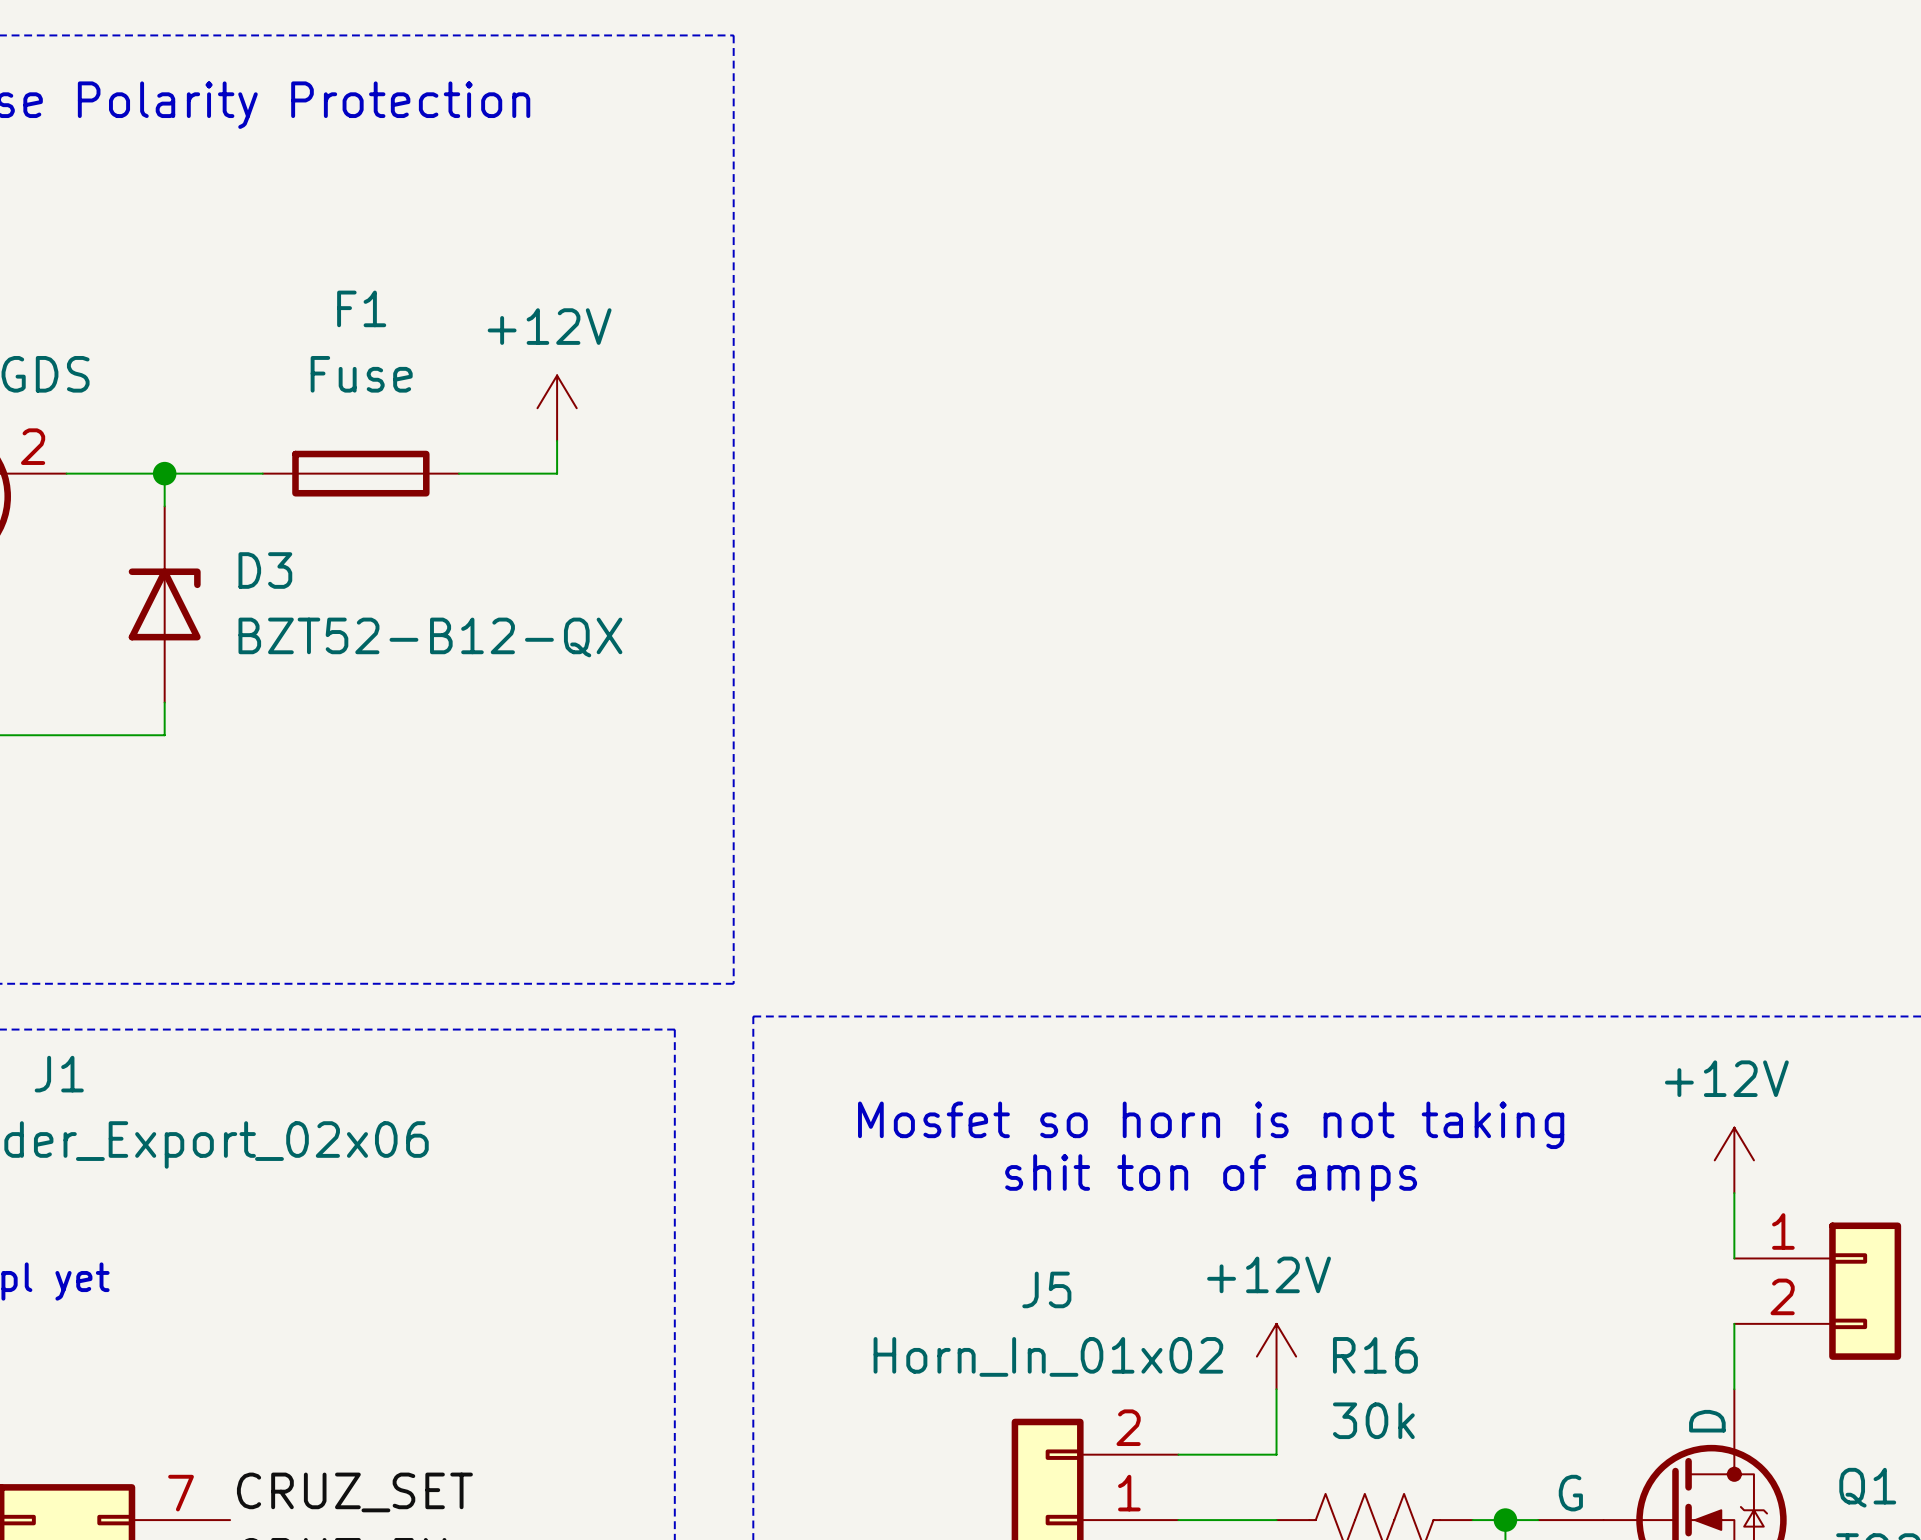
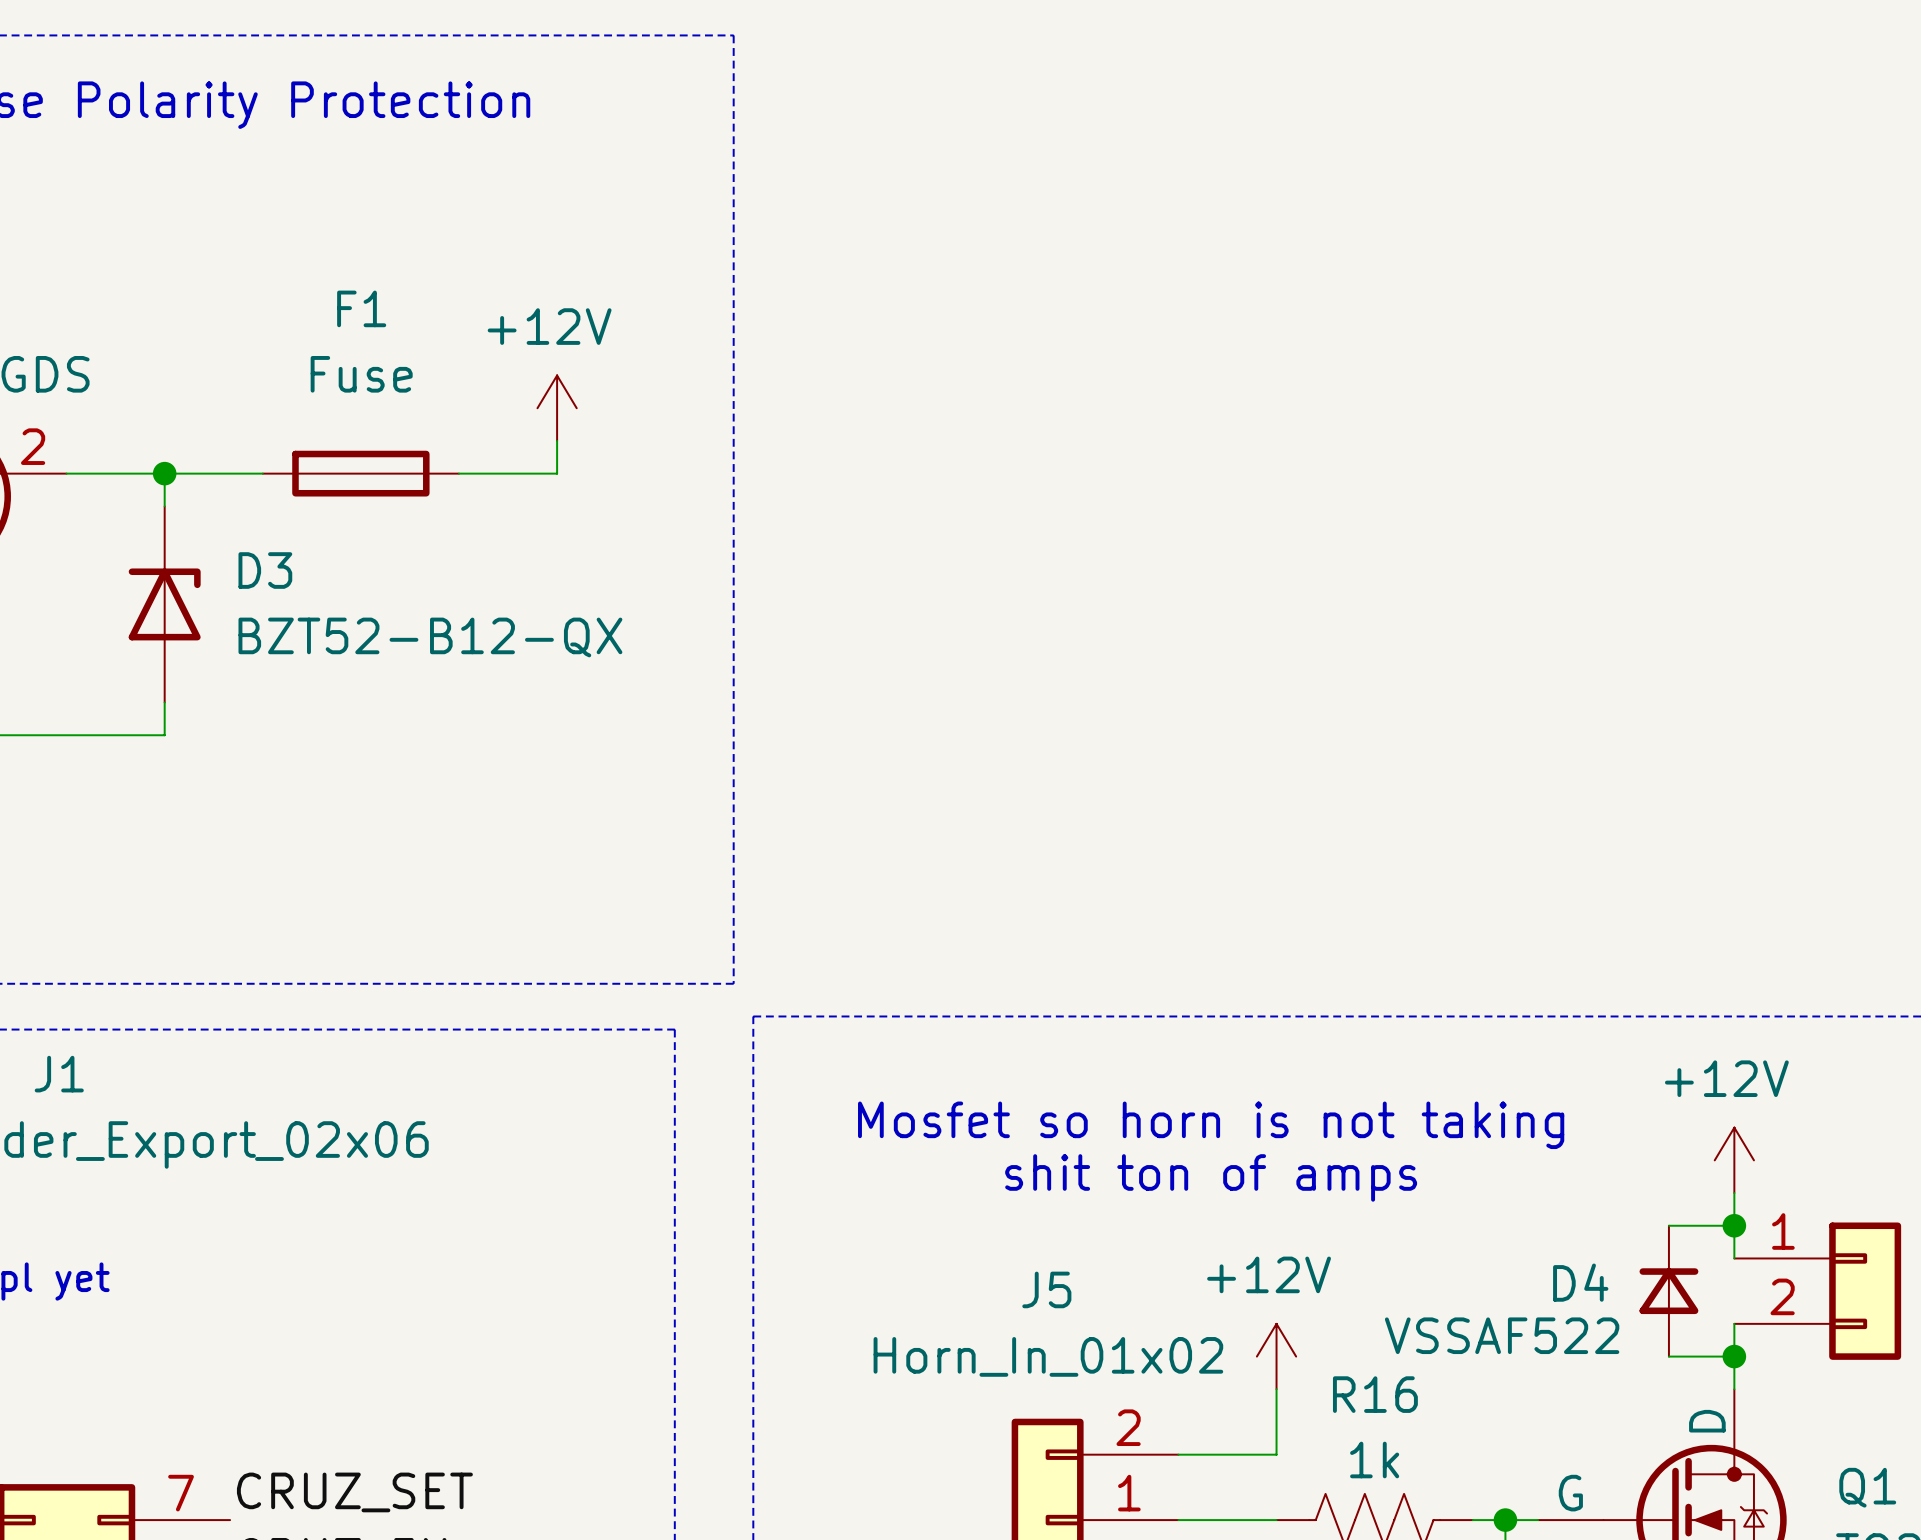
wire: none -> (1668, 1225) (1734, 1225)
junction: none -> (1734, 1225)
D4: none -> VSSAF522 (1668, 1291)
R16 name position: R16 (1375, 1355) -> R16 (1375, 1394)
wire: none -> (1668, 1356) (1734, 1356)
junction: none -> (1734, 1356)
R16 value: 30k (1373, 1420) -> 1k (1374, 1459)

